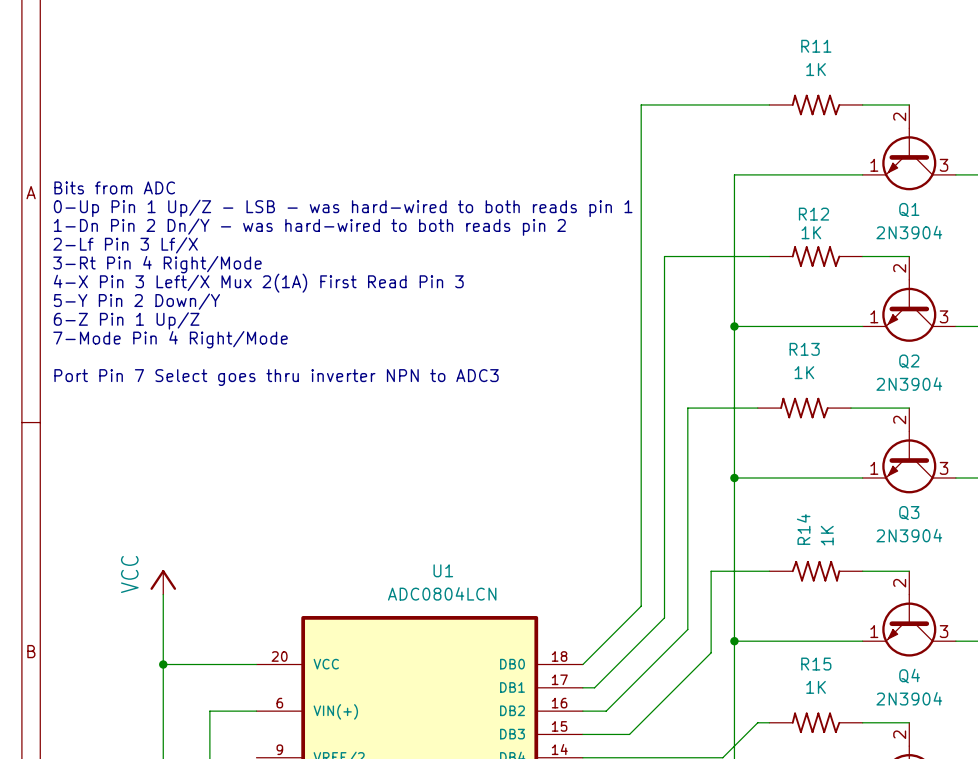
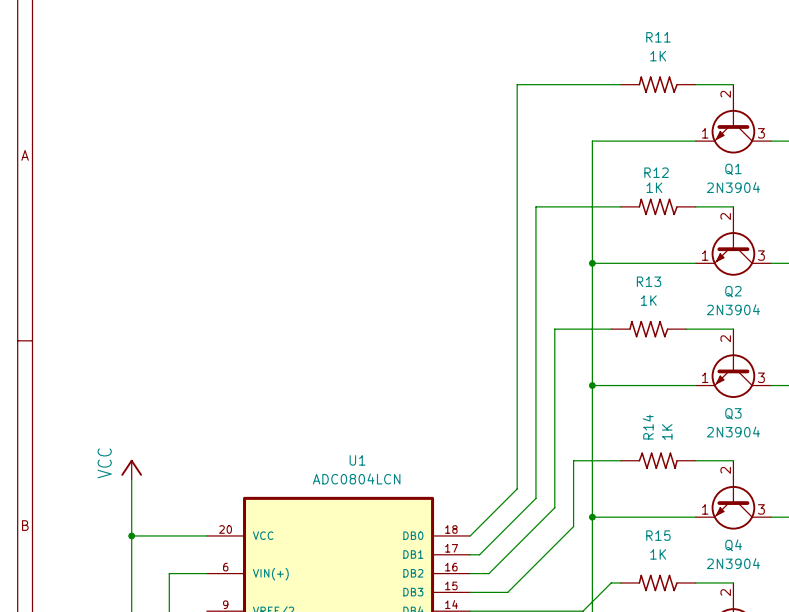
text: Bits from ADC (114, 187) -> none
text: 0-Up Pin 1 Up/Z - LSB - was hard-wired to both reads pin 1 (343, 208) -> none
text: 1-Dn Pin 2 Dn/Y - was hard-wired to both reads pin 2 (309, 227) -> none
text: 2-Lf Pin 3 Lf/X (125, 245) -> none
text: 3-Rt Pin 4 Right/Mode (157, 264) -> none
text: 4-X Pin 3 Left/X Mux 2(1A) First Read Pin 3 (258, 283) -> none
text: 5-Y Pin 2 Down/Y (136, 301) -> none
text: 6-Z Pin 1 Up/Z (126, 320) -> none
text: 7-Mode Pin 4 Right/Mode (170, 339) -> none
text: Port Pin 7 Select goes thru inverter NPN to ADC3 (276, 377) -> none

